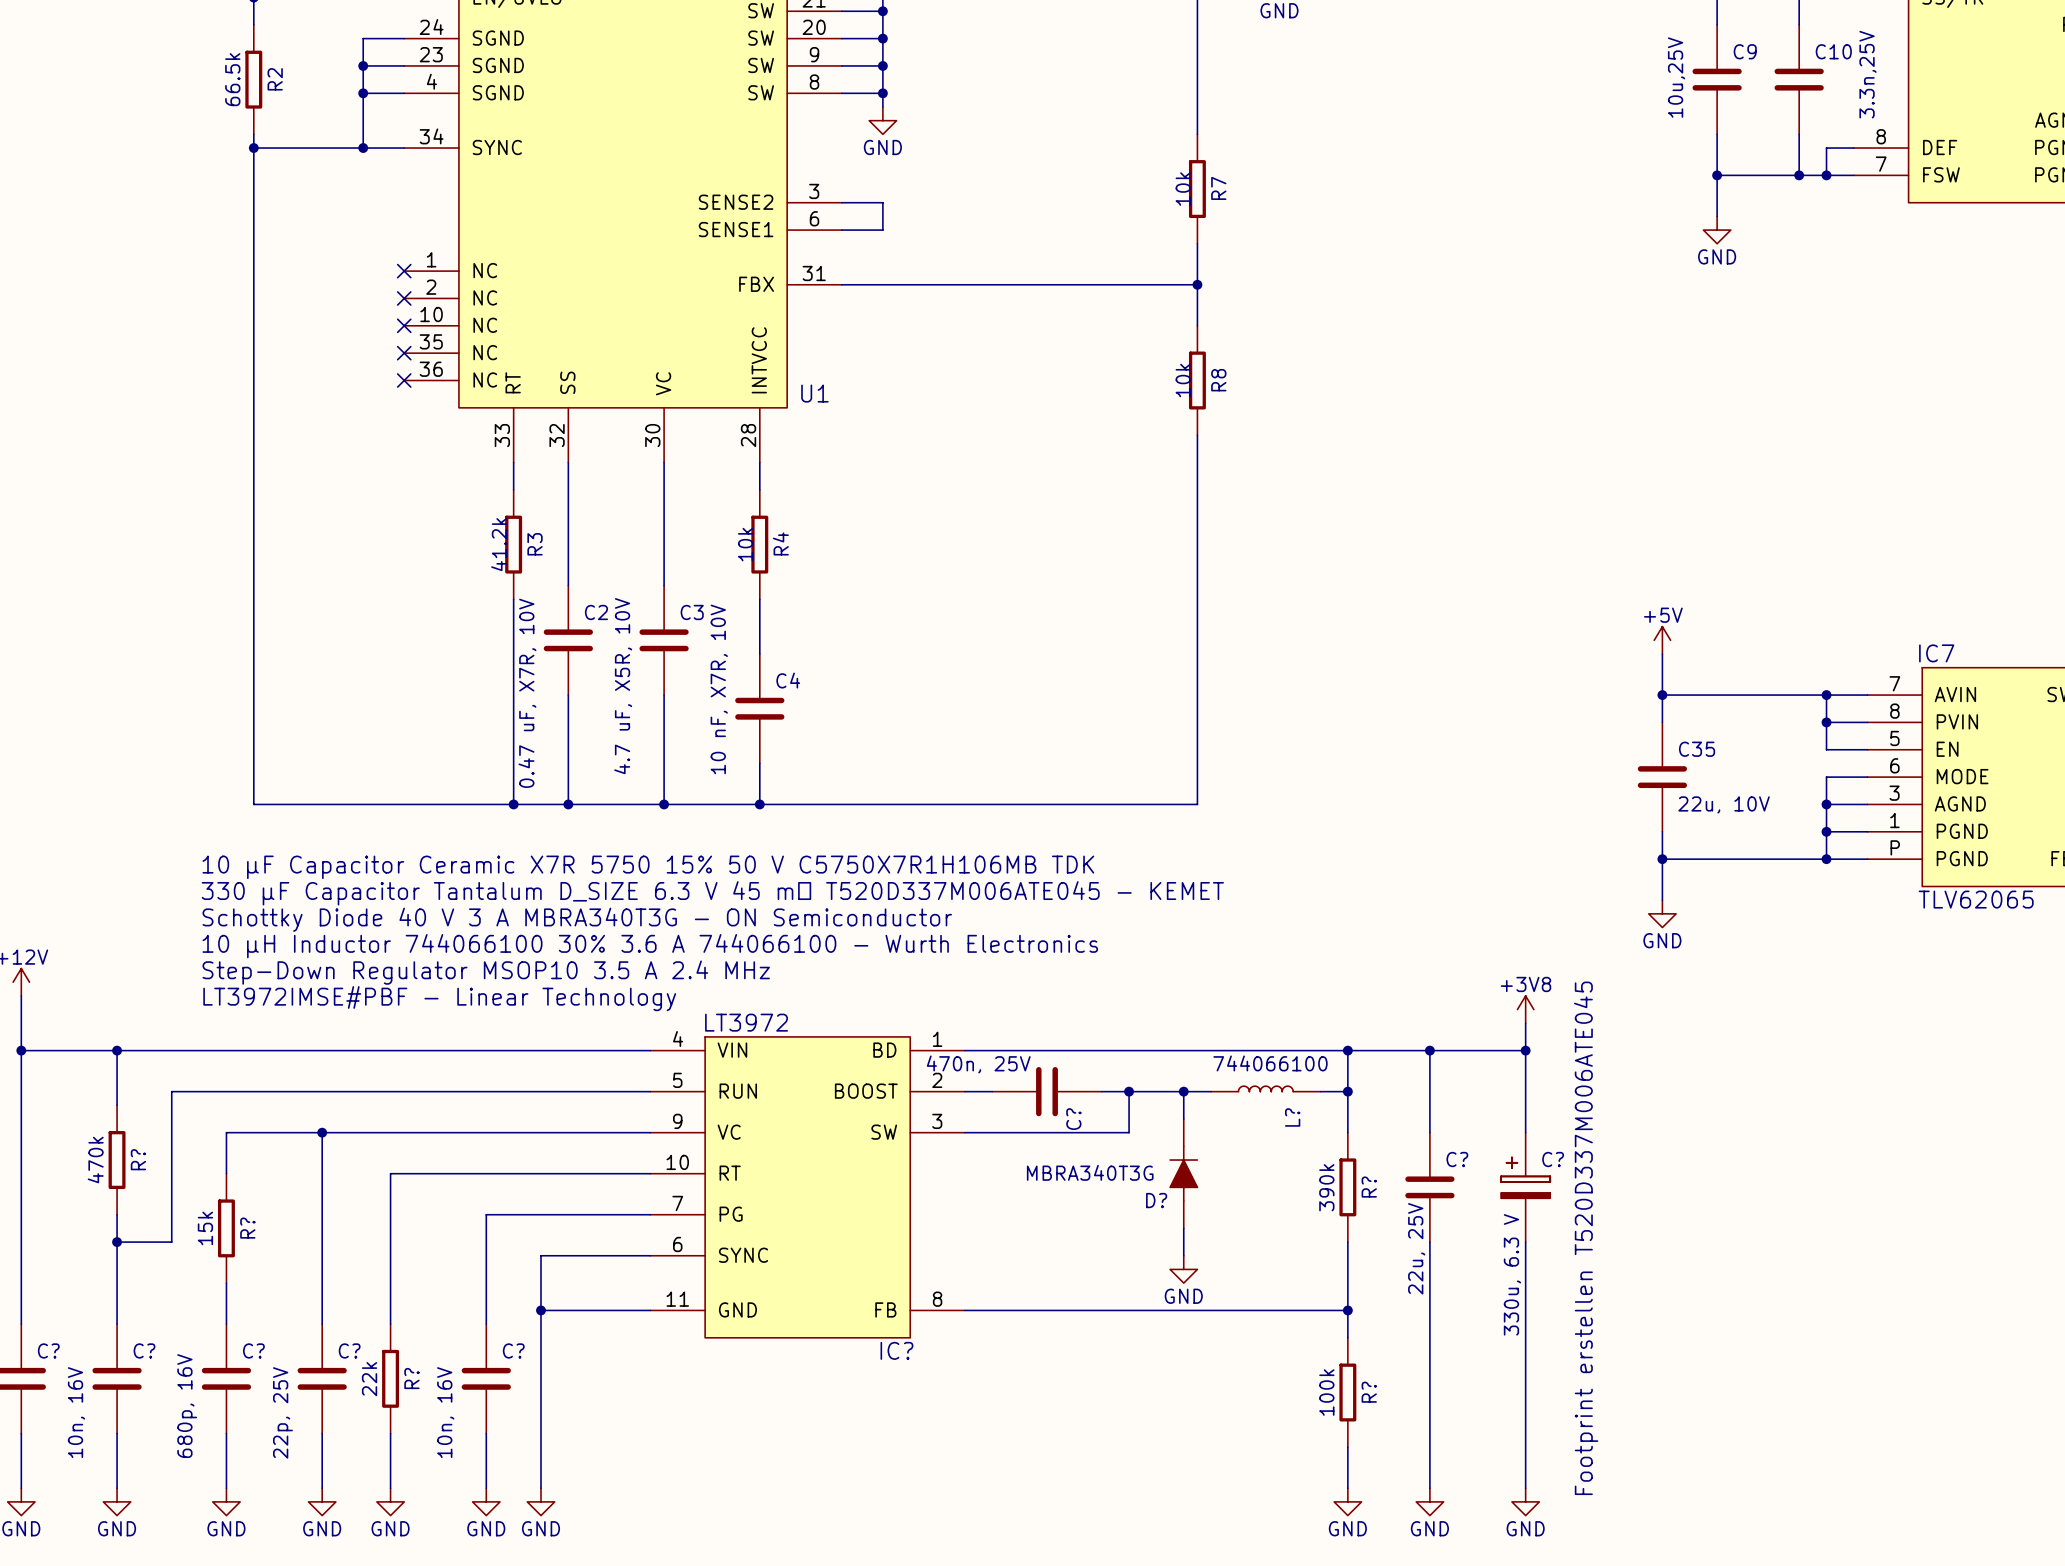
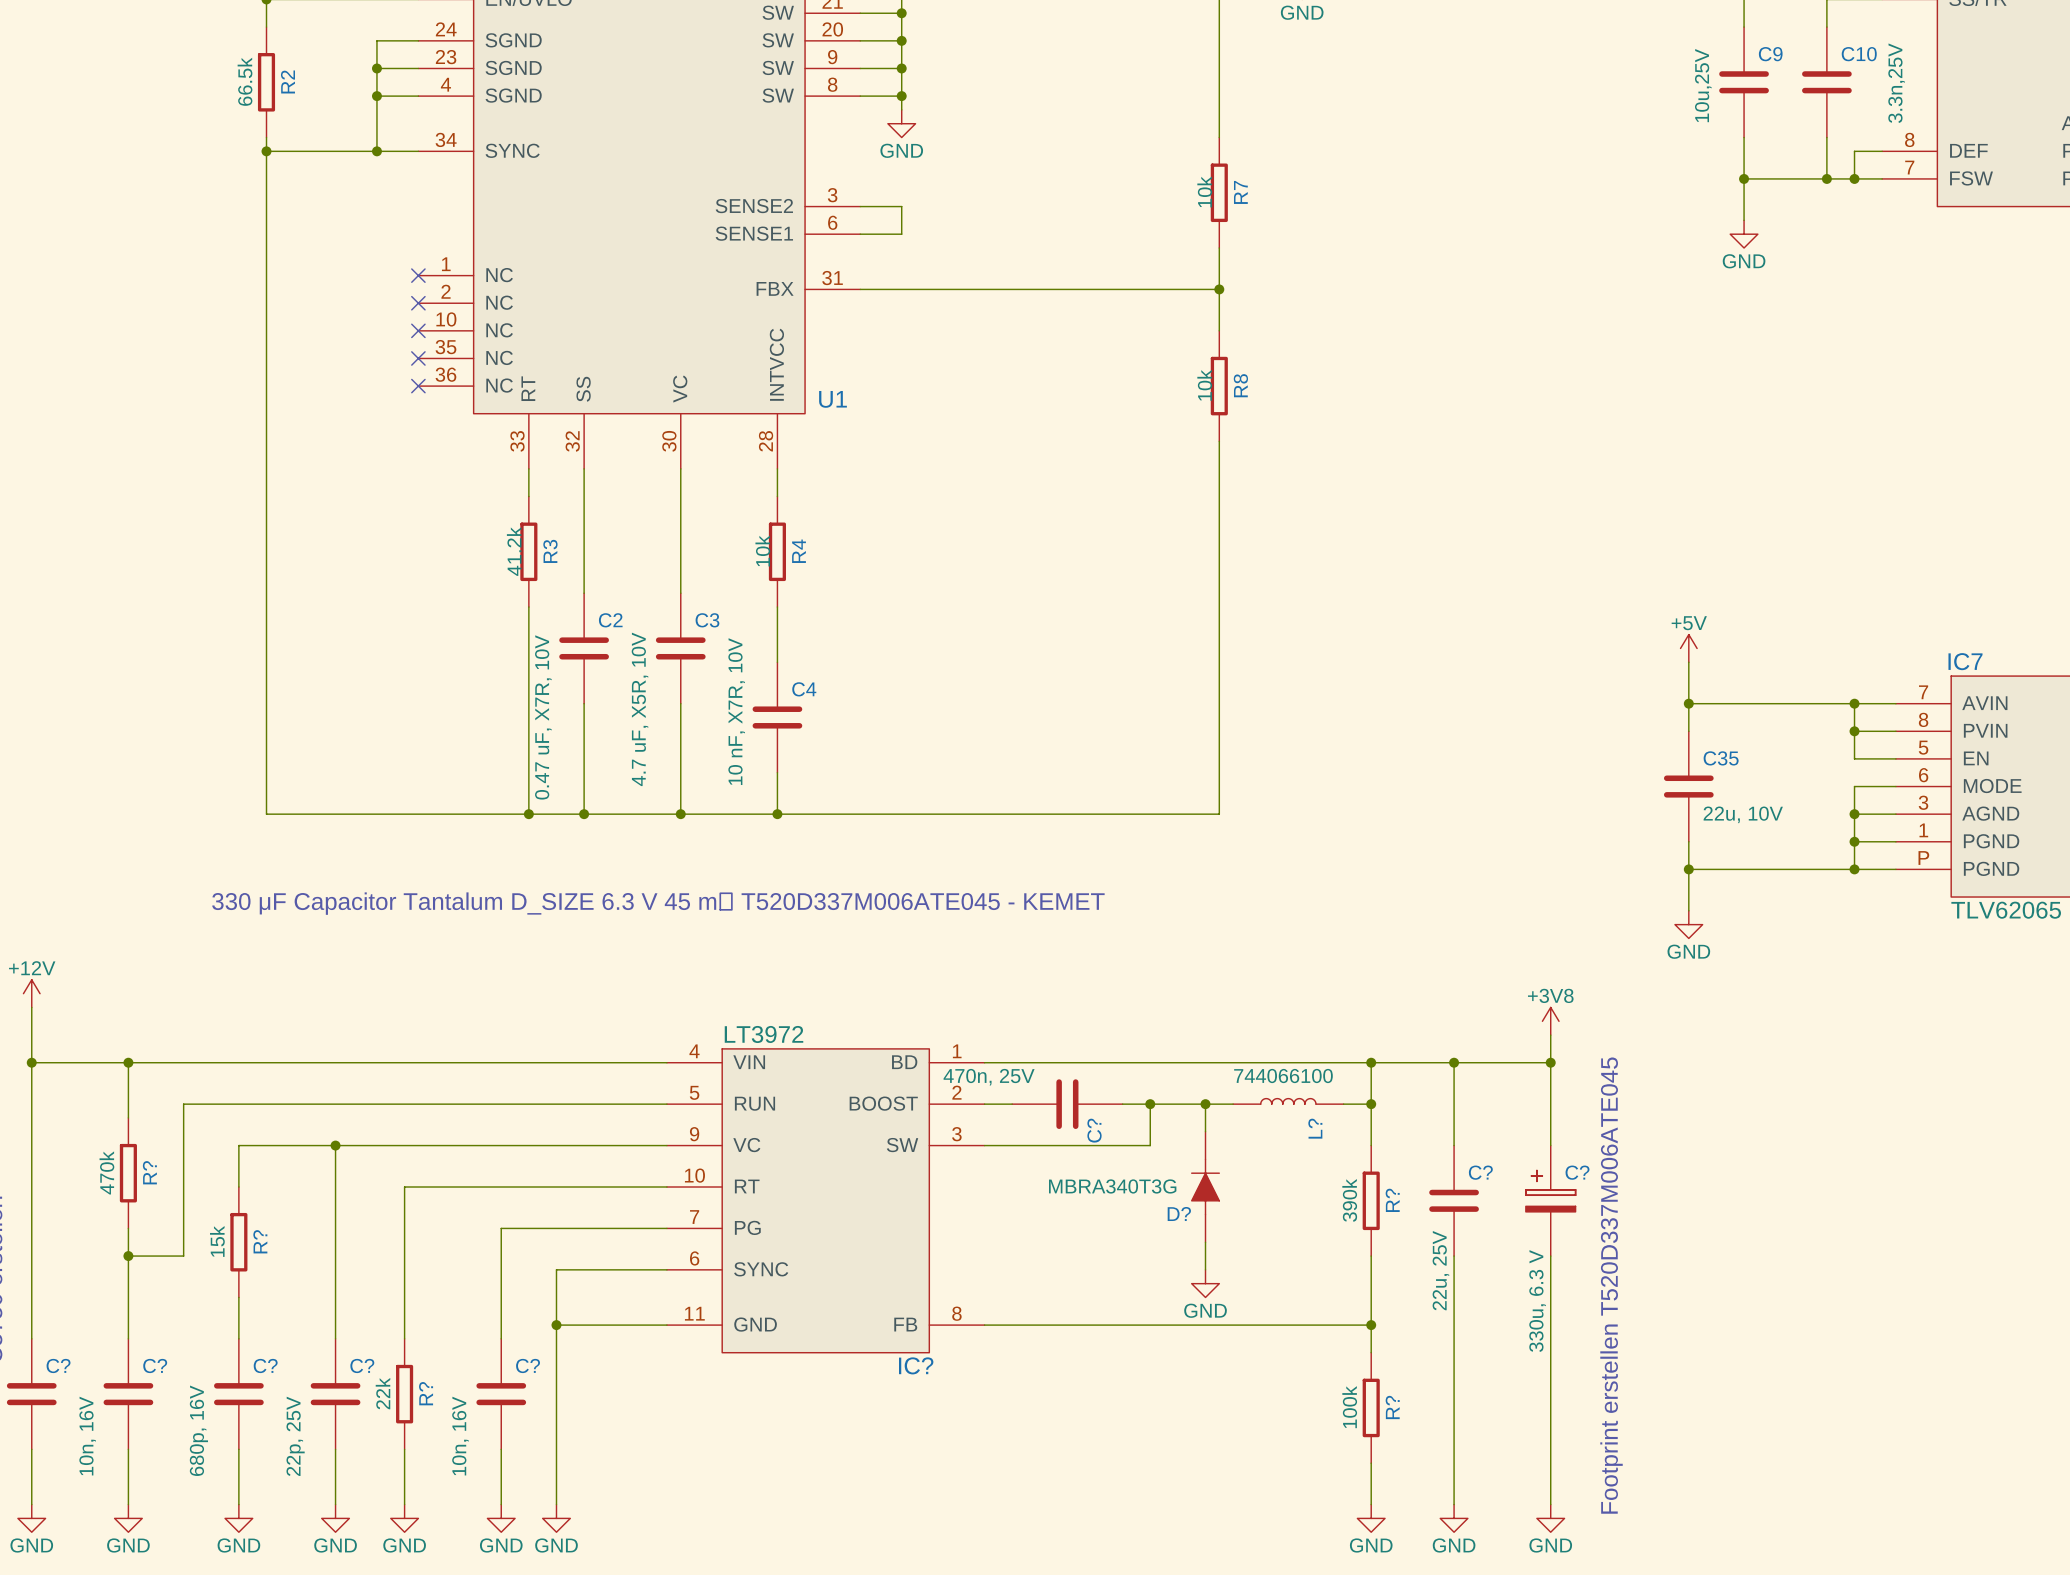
text: 10 μF Capacitor Ceramic X7R 5750 15% 50 V C5750X7R1H106MB TDK (648, 867) -> none
text: Schottky Diode 40 V 3 A MBRA340T3G - ON Semiconductor (577, 919) -> none
text: 10 μH Inductor 744066100 30% 3.6 A 744066100 - Wurth Electronics (650, 946) -> none
text: Step-Down Regulator MSOP10 3.5 A 2.4 MHz (486, 972) -> none
text: LT3972IMSE#PBF - Linear Technology (439, 998) -> none

